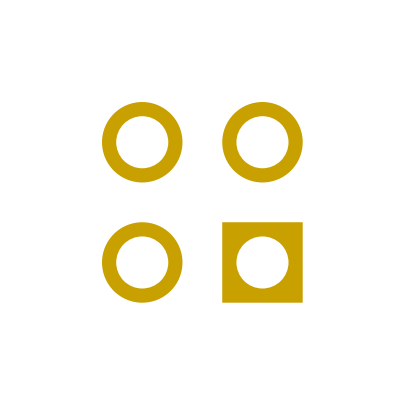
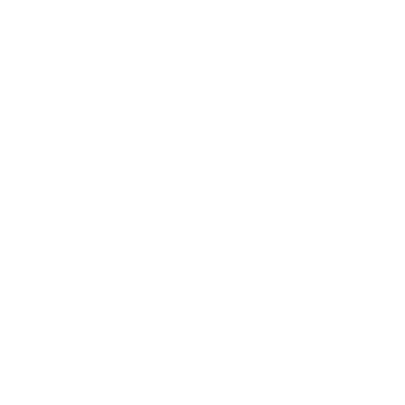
part: (202, 202) -> none

